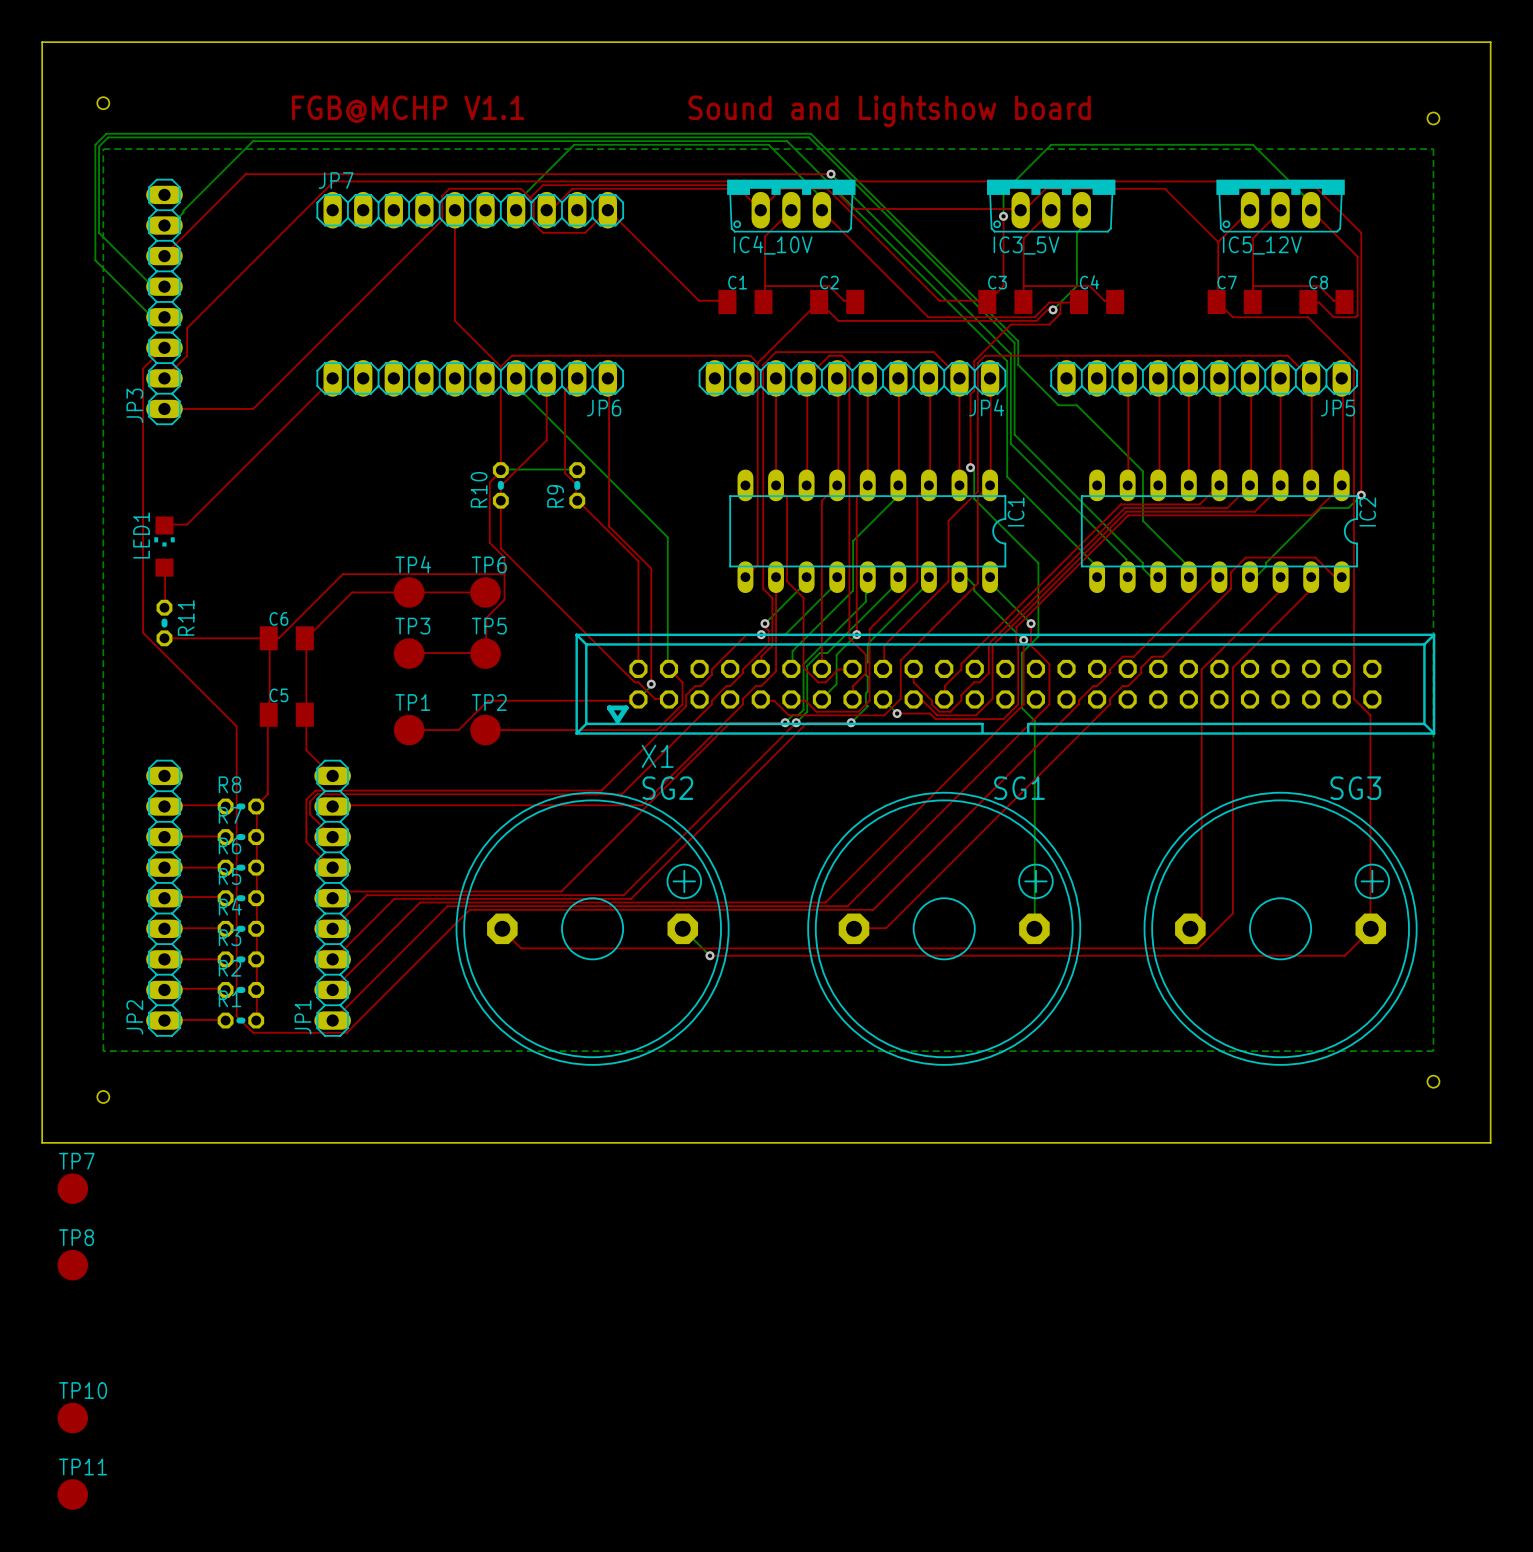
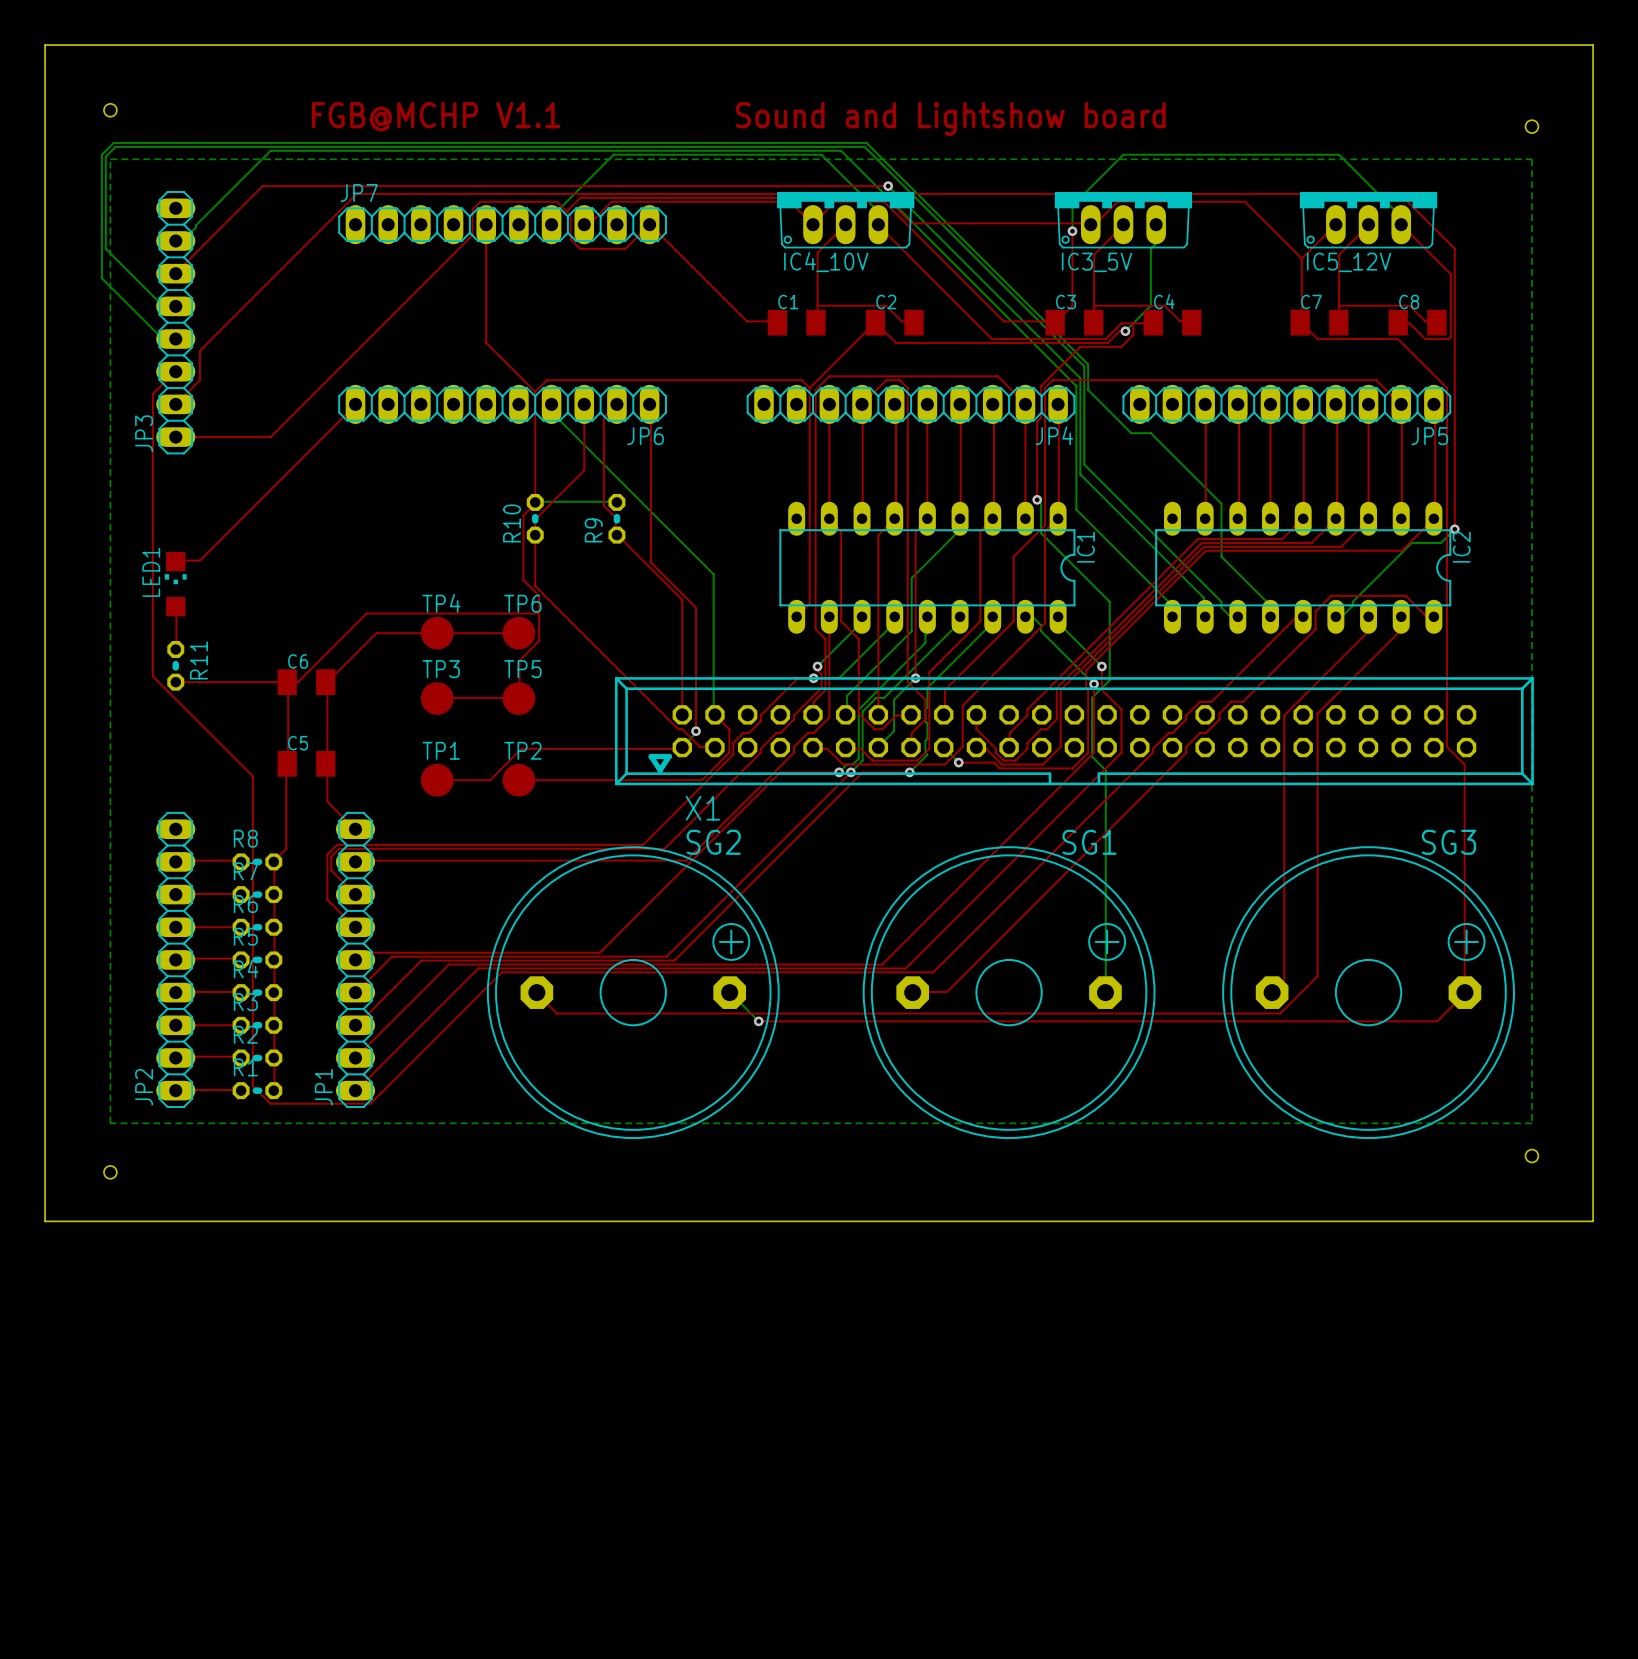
TP7: (72, 1188) -> none
TP8: (72, 1265) -> none
TP10: (72, 1418) -> none
TP11: (72, 1494) -> none

